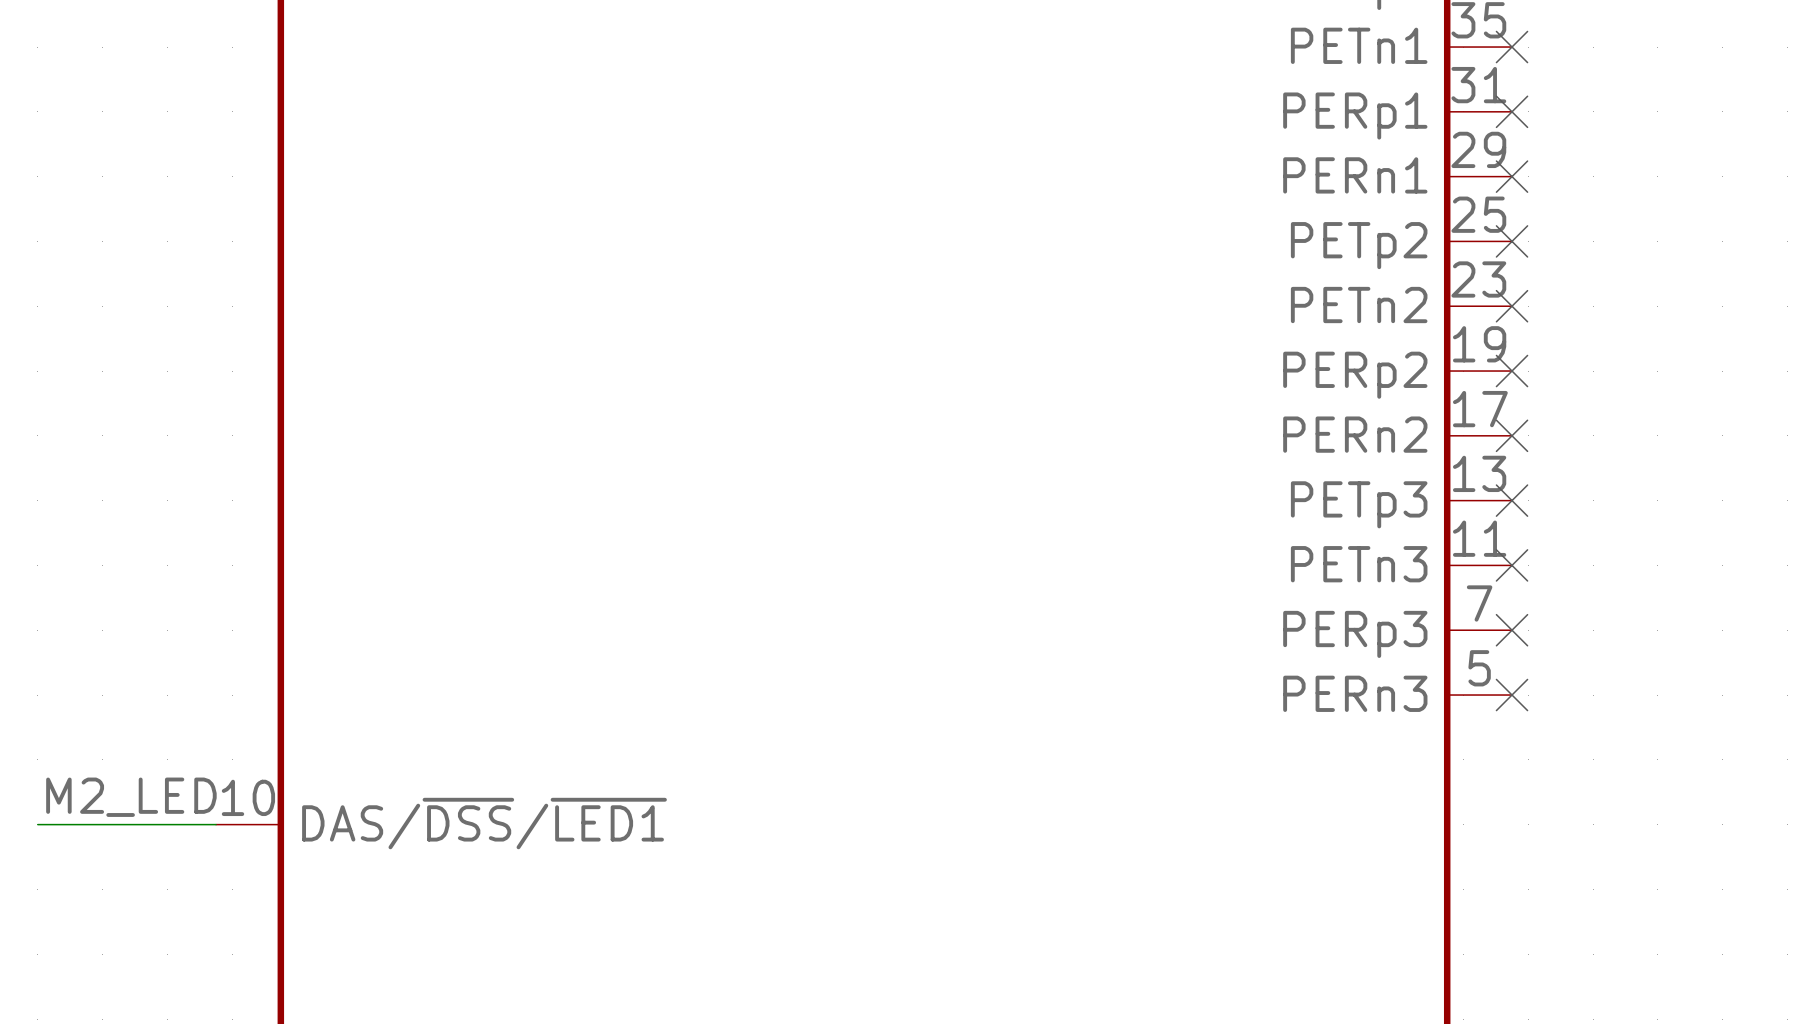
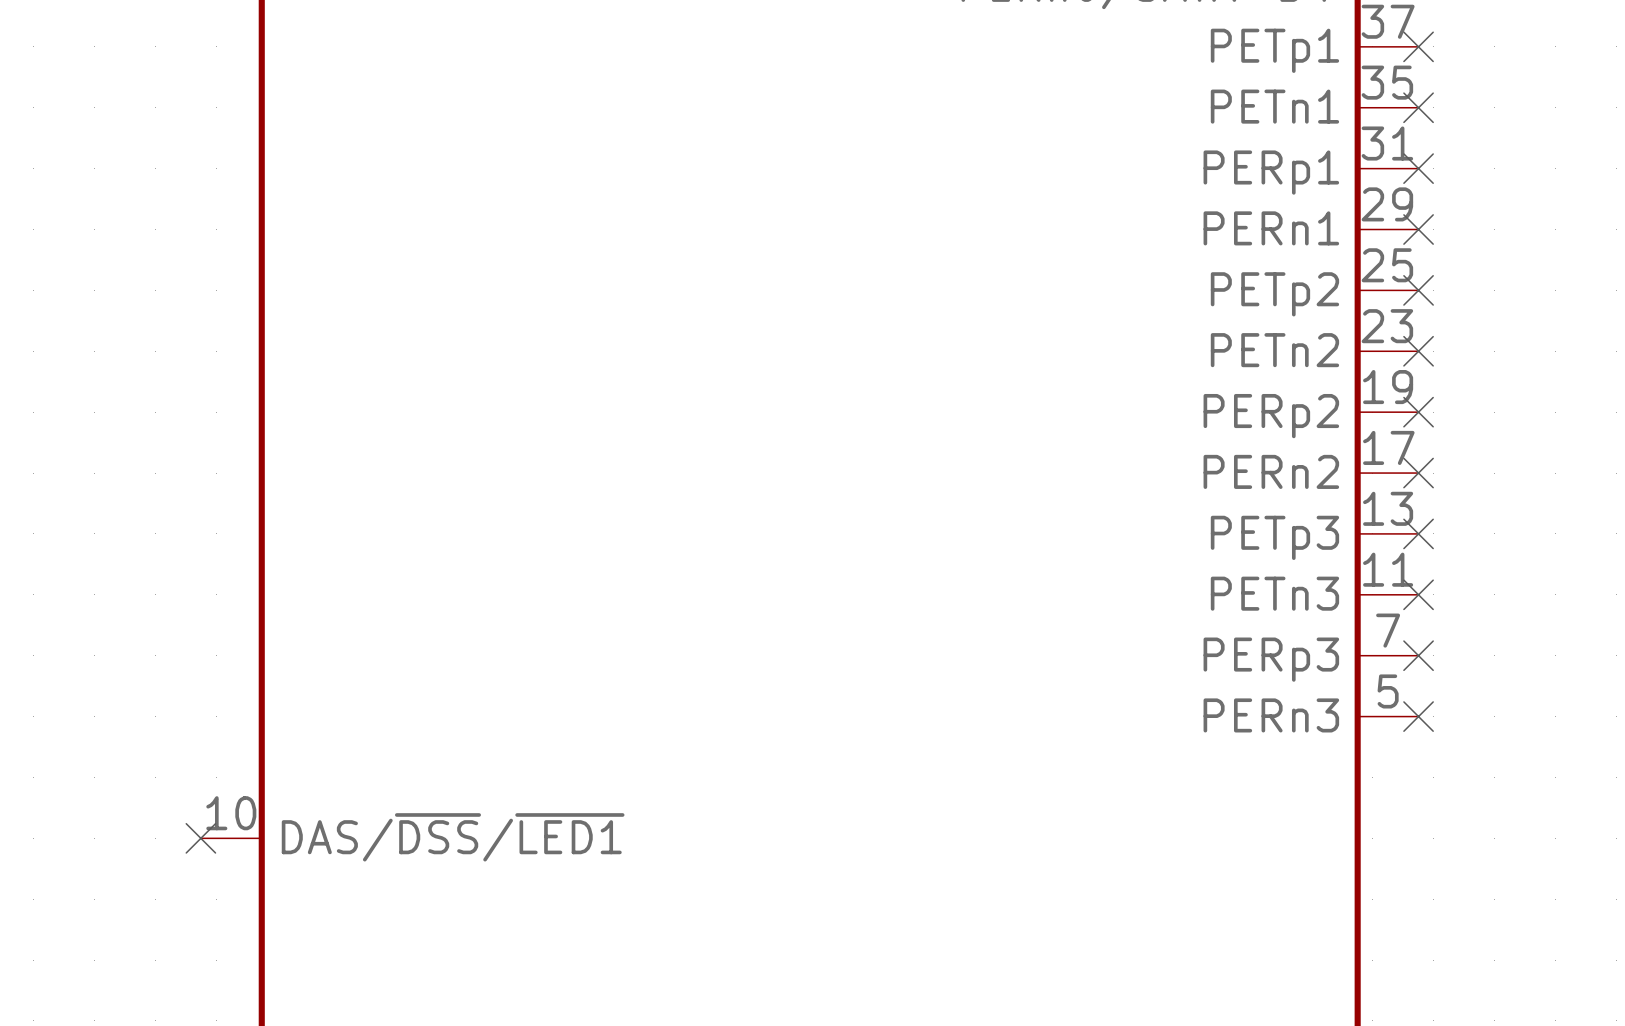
label: M2_LED (131, 797) -> none
wire: (37, 824) (216, 824) -> none
no-connect mark: none -> (200, 838)

